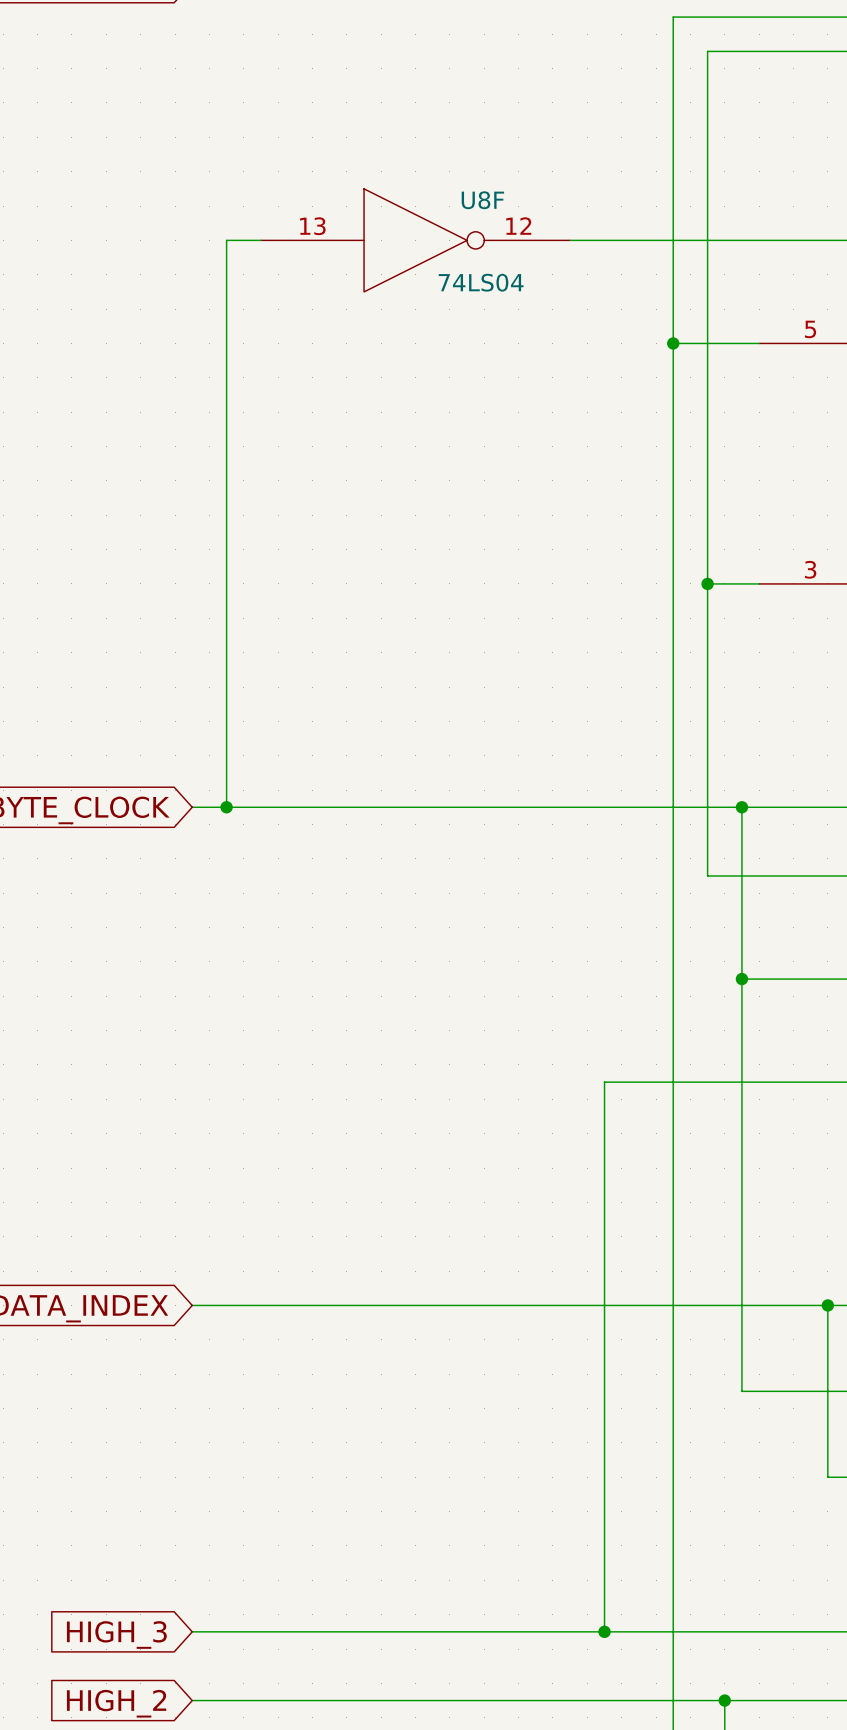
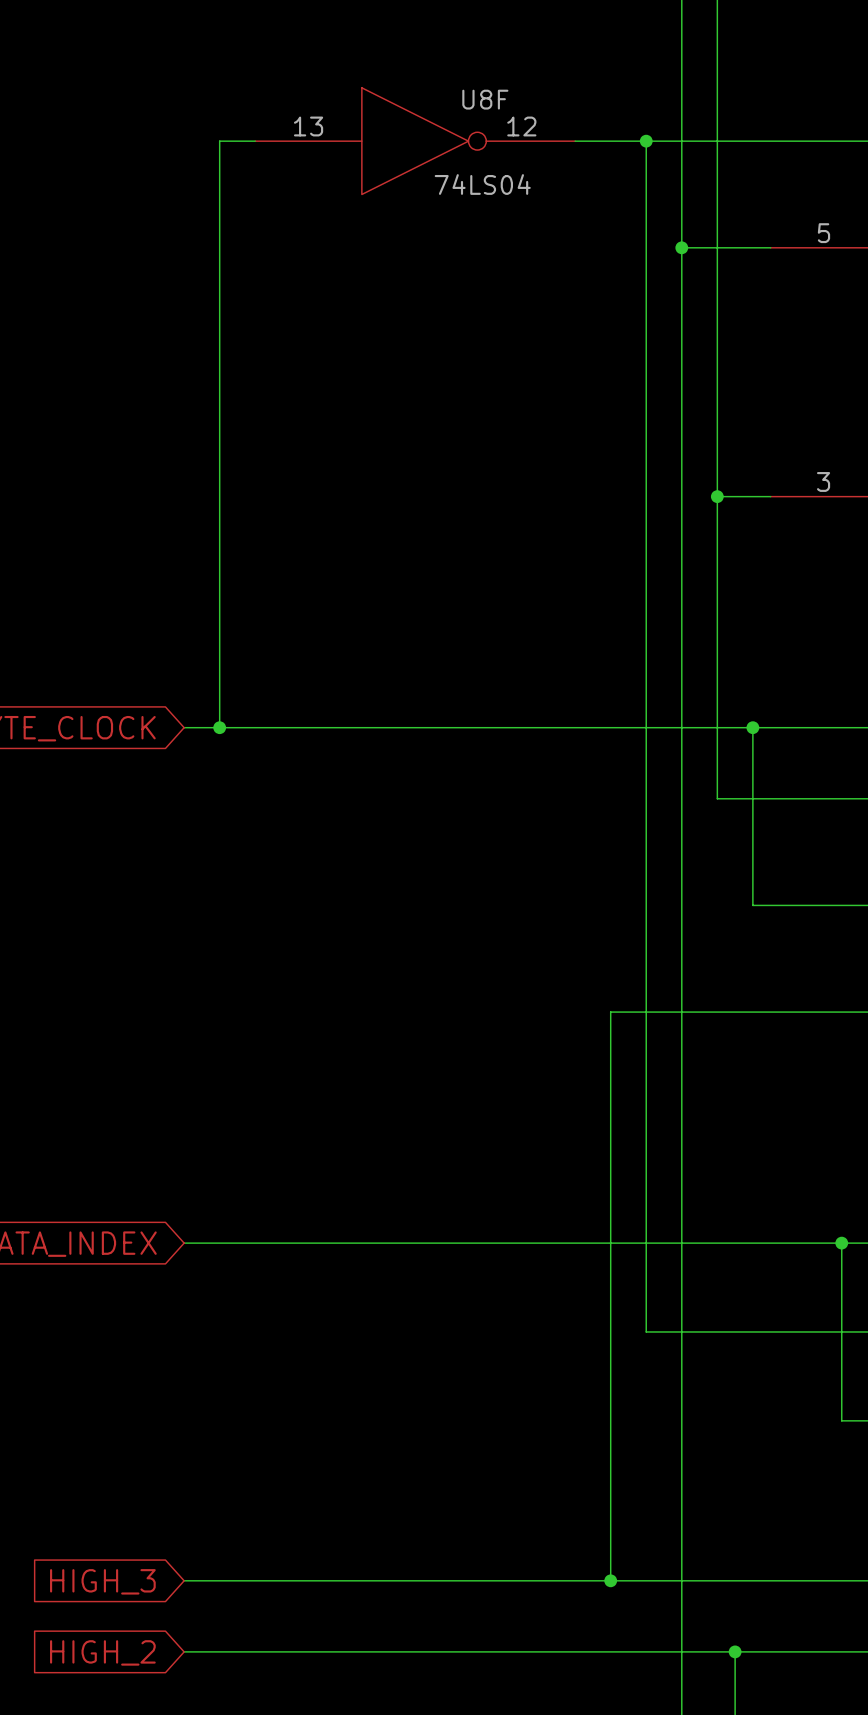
junction: none -> (646, 141)
wire: (741, 979) (741, 1391) -> (646, 141) (646, 1331) (752, 1331)
junction: (741, 979) -> none

